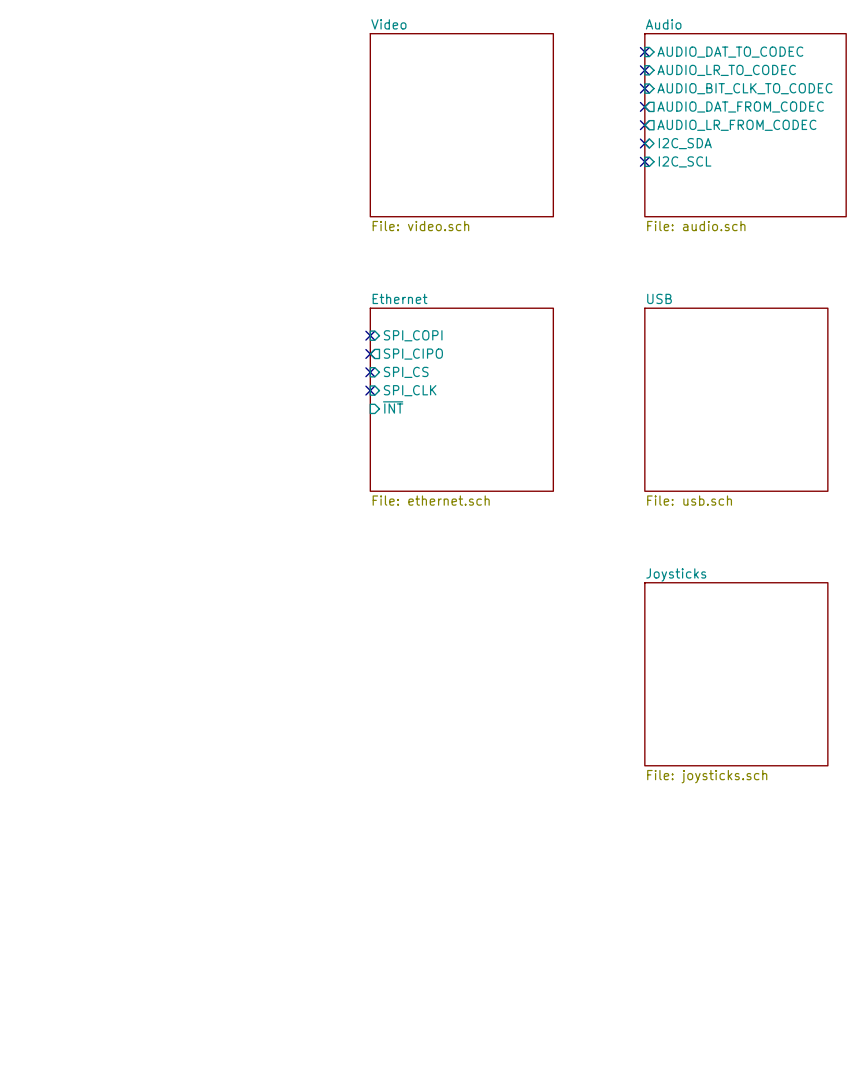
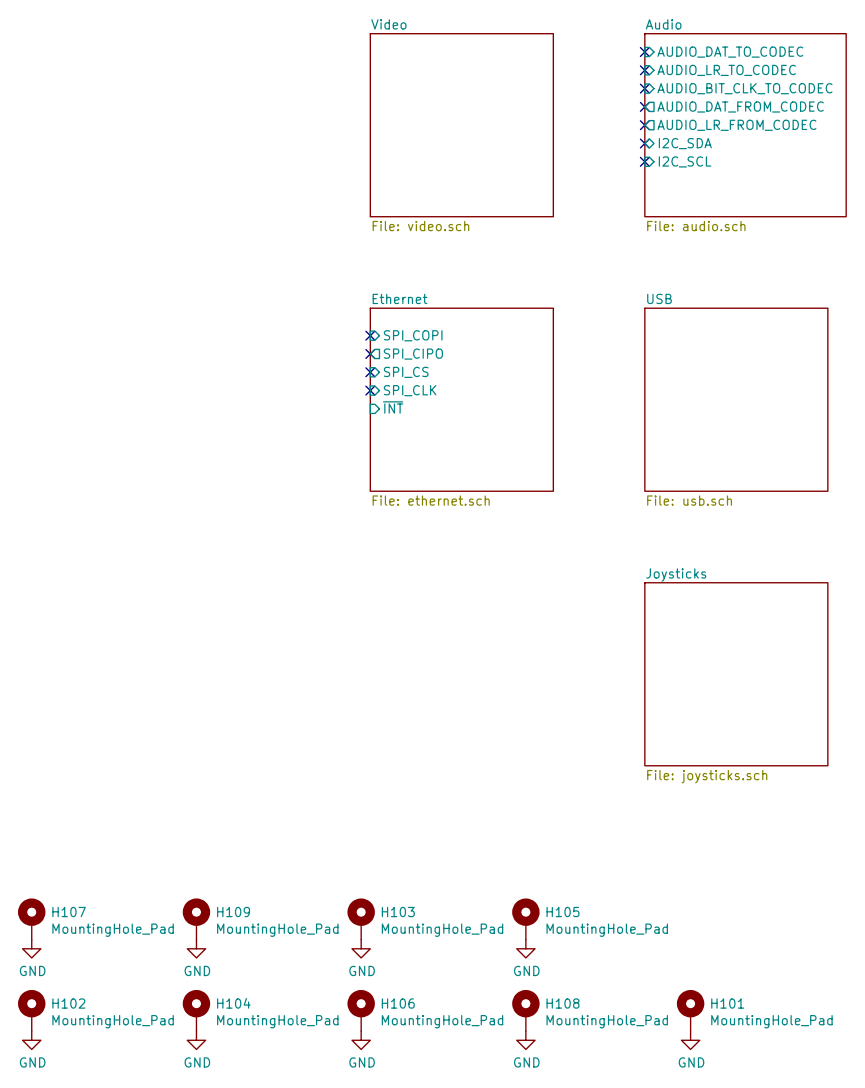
H107: none -> MountingHole_Pad (31, 919)
H109: none -> MountingHole_Pad (196, 919)
H103: none -> MountingHole_Pad (361, 919)
H105: none -> MountingHole_Pad (525, 919)
power symbol: none -> GND (31, 948)
power symbol: none -> GND (196, 948)
power symbol: none -> GND (361, 948)
power symbol: none -> GND (525, 948)
H102: none -> MountingHole_Pad (31, 1010)
H104: none -> MountingHole_Pad (196, 1010)
H106: none -> MountingHole_Pad (361, 1010)
H108: none -> MountingHole_Pad (525, 1010)
H101: none -> MountingHole_Pad (690, 1010)
power symbol: none -> GND (31, 1040)
power symbol: none -> GND (196, 1040)
power symbol: none -> GND (361, 1040)
power symbol: none -> GND (525, 1040)
power symbol: none -> GND (690, 1040)

